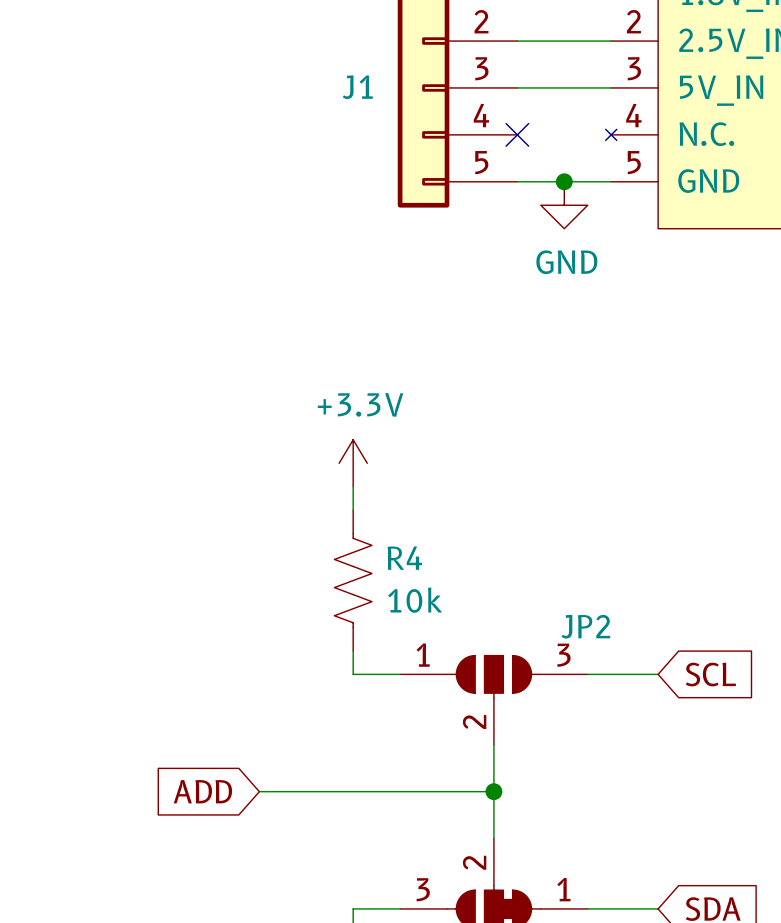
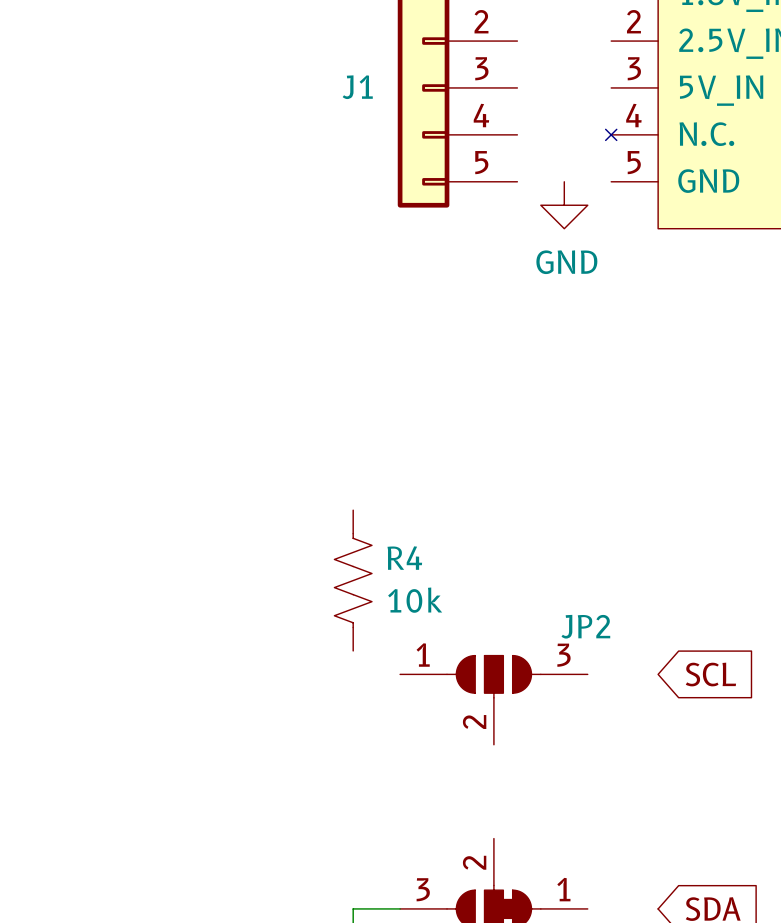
wire: (517, 41) (611, 41) -> none
wire: (517, 87) (611, 87) -> none
no-connect mark: (517, 134) -> none
wire: (517, 181) (611, 181) -> none
junction: (564, 181) -> none
power symbol: +3.3V (353, 463) -> none
wire: (353, 486) (353, 510) -> none
wire: (353, 650) (353, 674) (400, 674) -> none
wire: (587, 674) (658, 674) -> none
wire: (493, 744) (493, 838) -> none
global label: ADD (202, 791) -> none
wire: (259, 791) (493, 791) -> none
junction: (493, 791) -> none
wire: (587, 908) (658, 908) -> none

